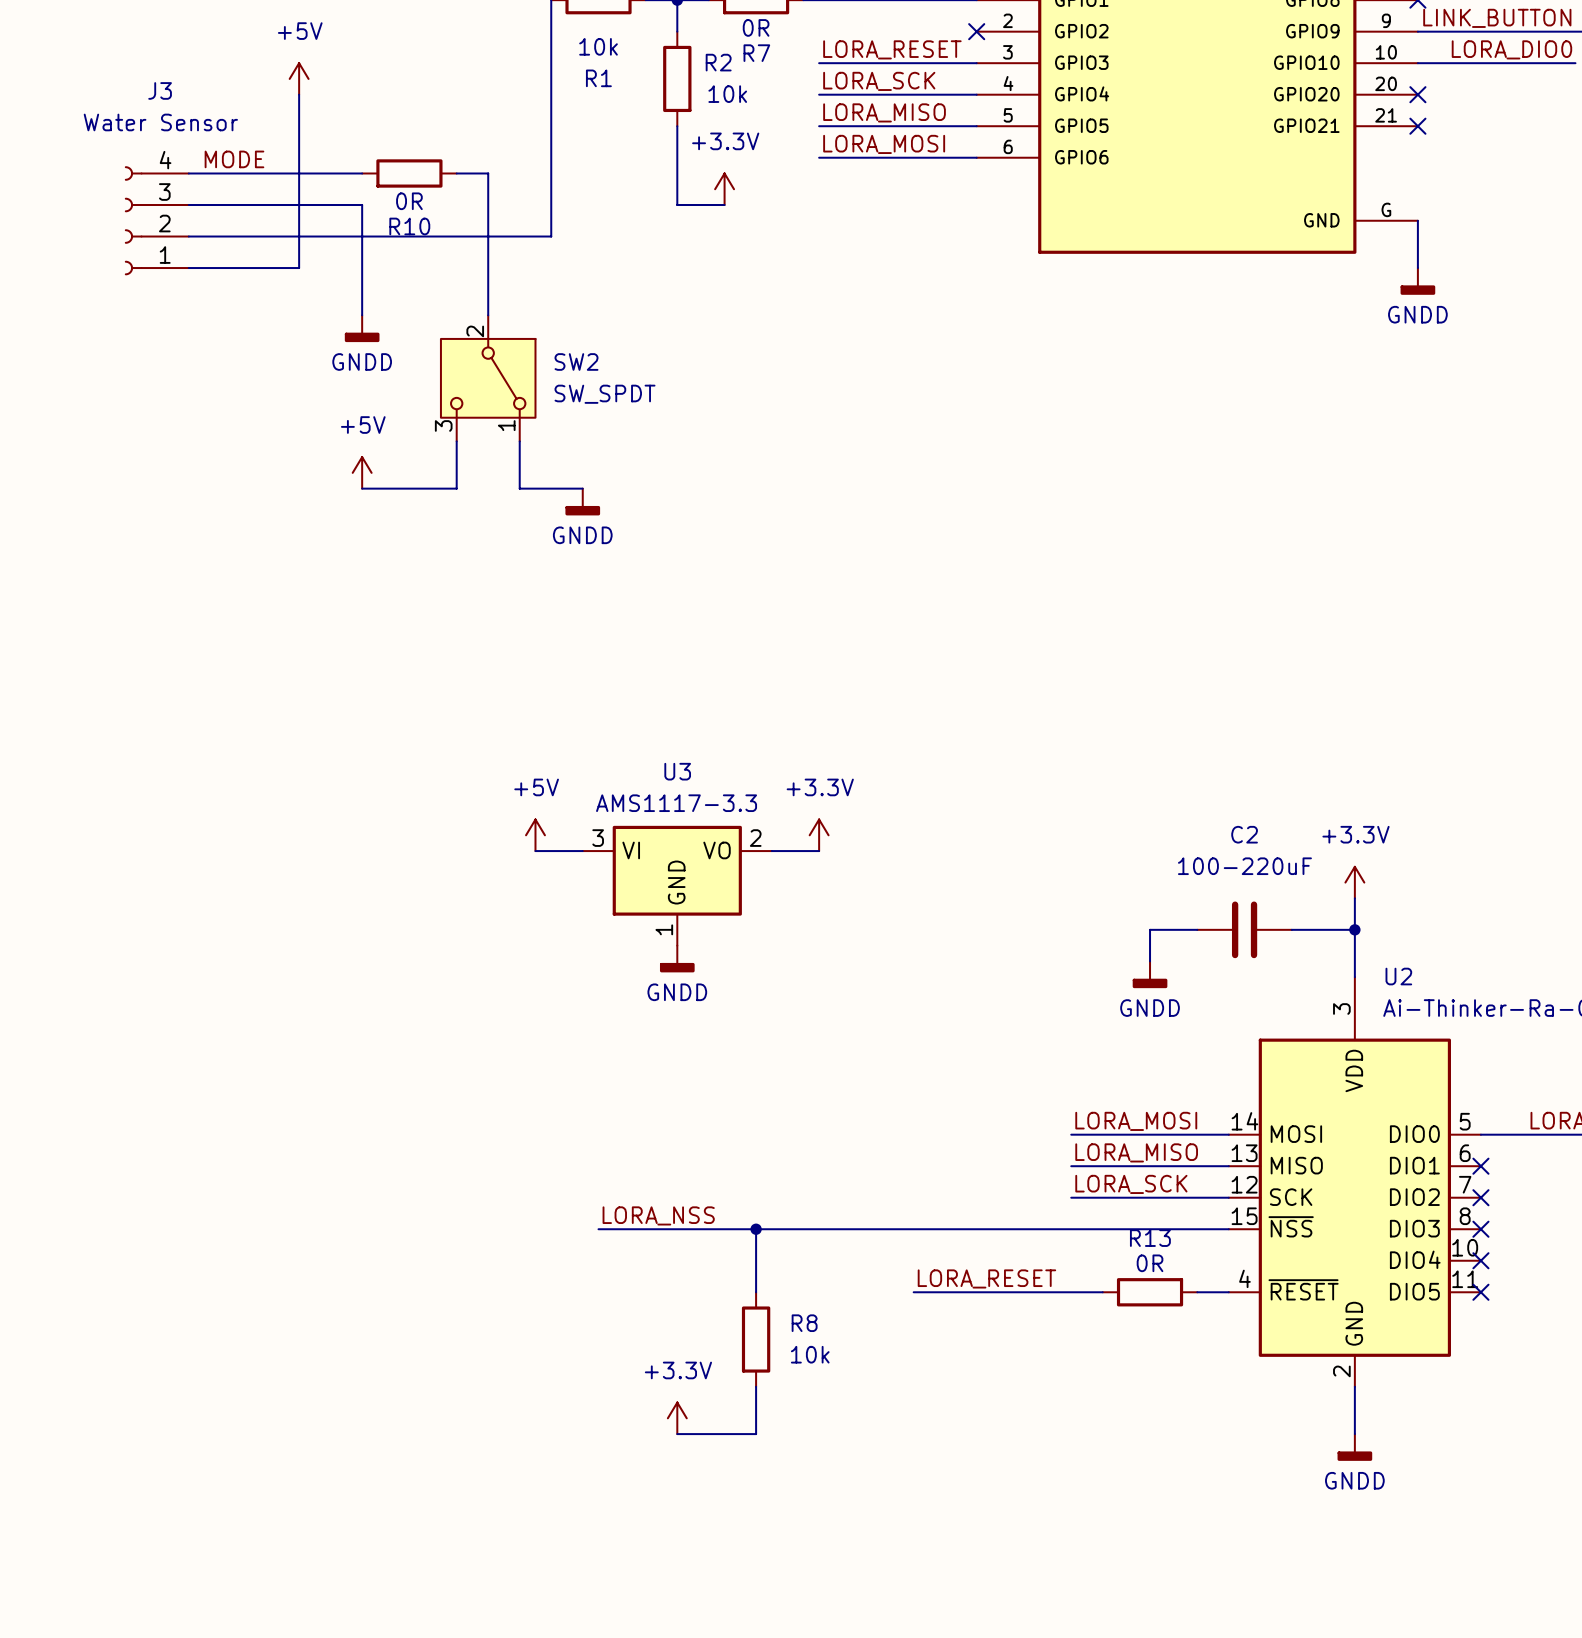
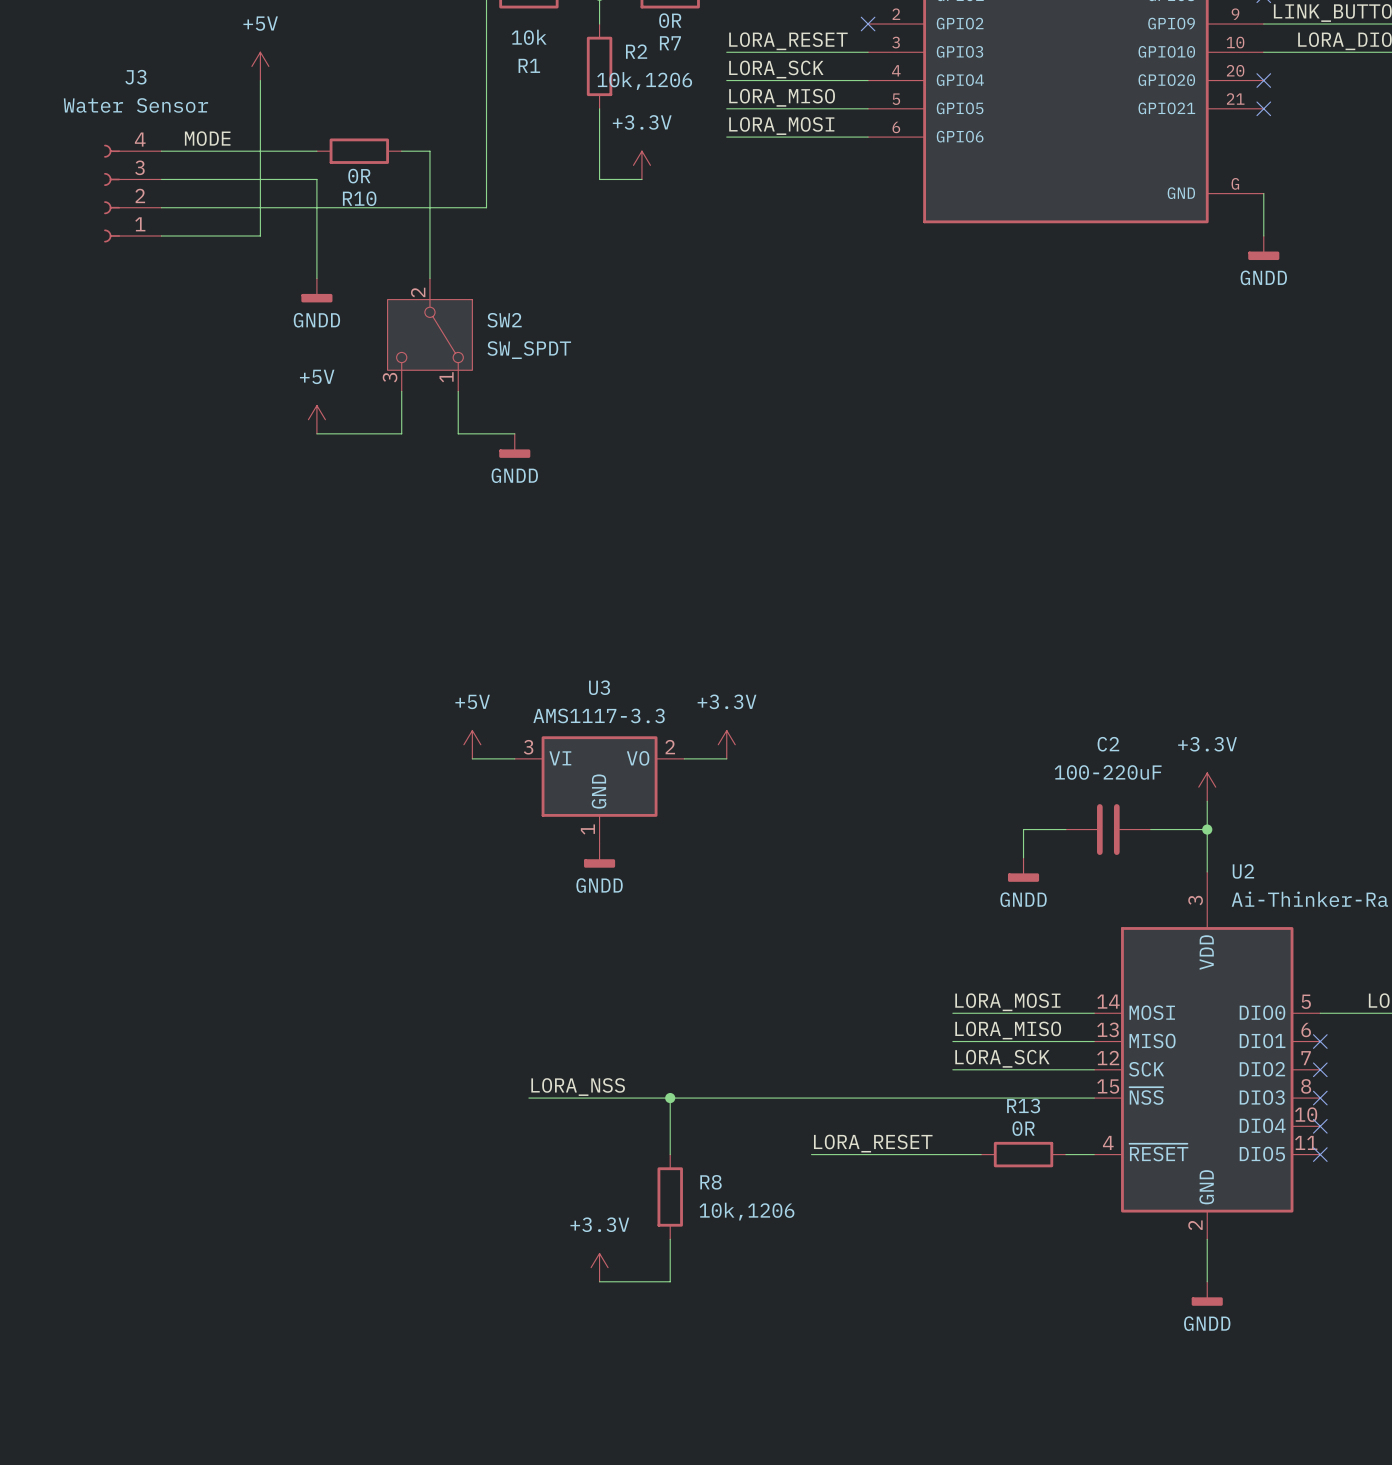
R2 value: 10k (727, 94) -> 10k,1206 (644, 81)
R8 value: 10k (810, 1354) -> 10k,1206 (746, 1211)

